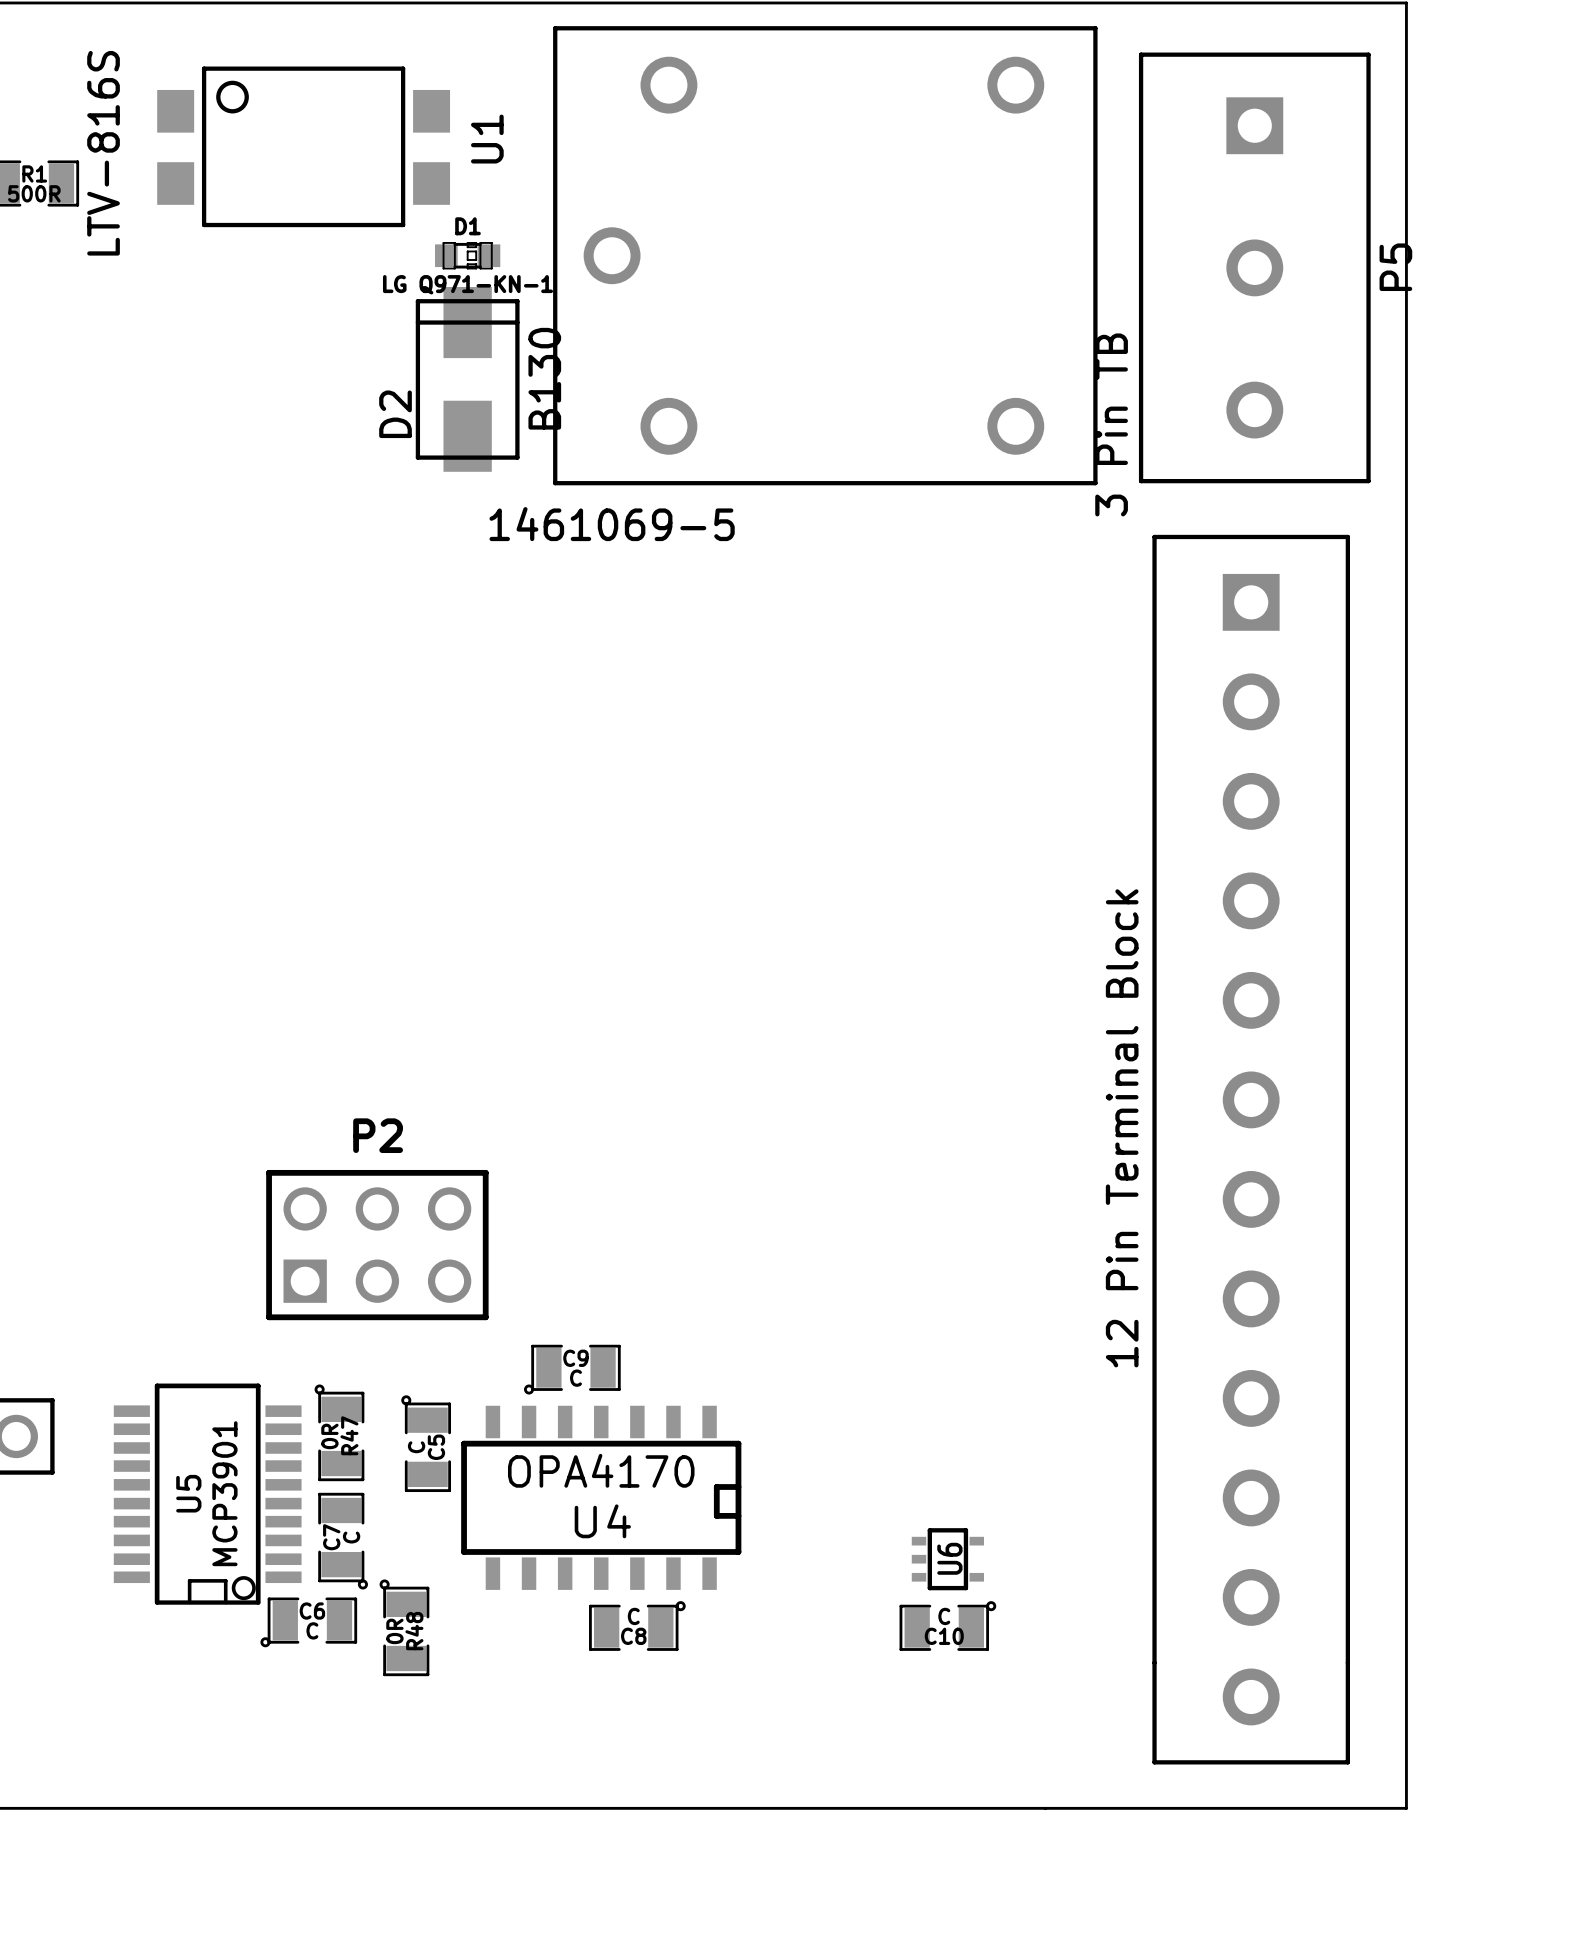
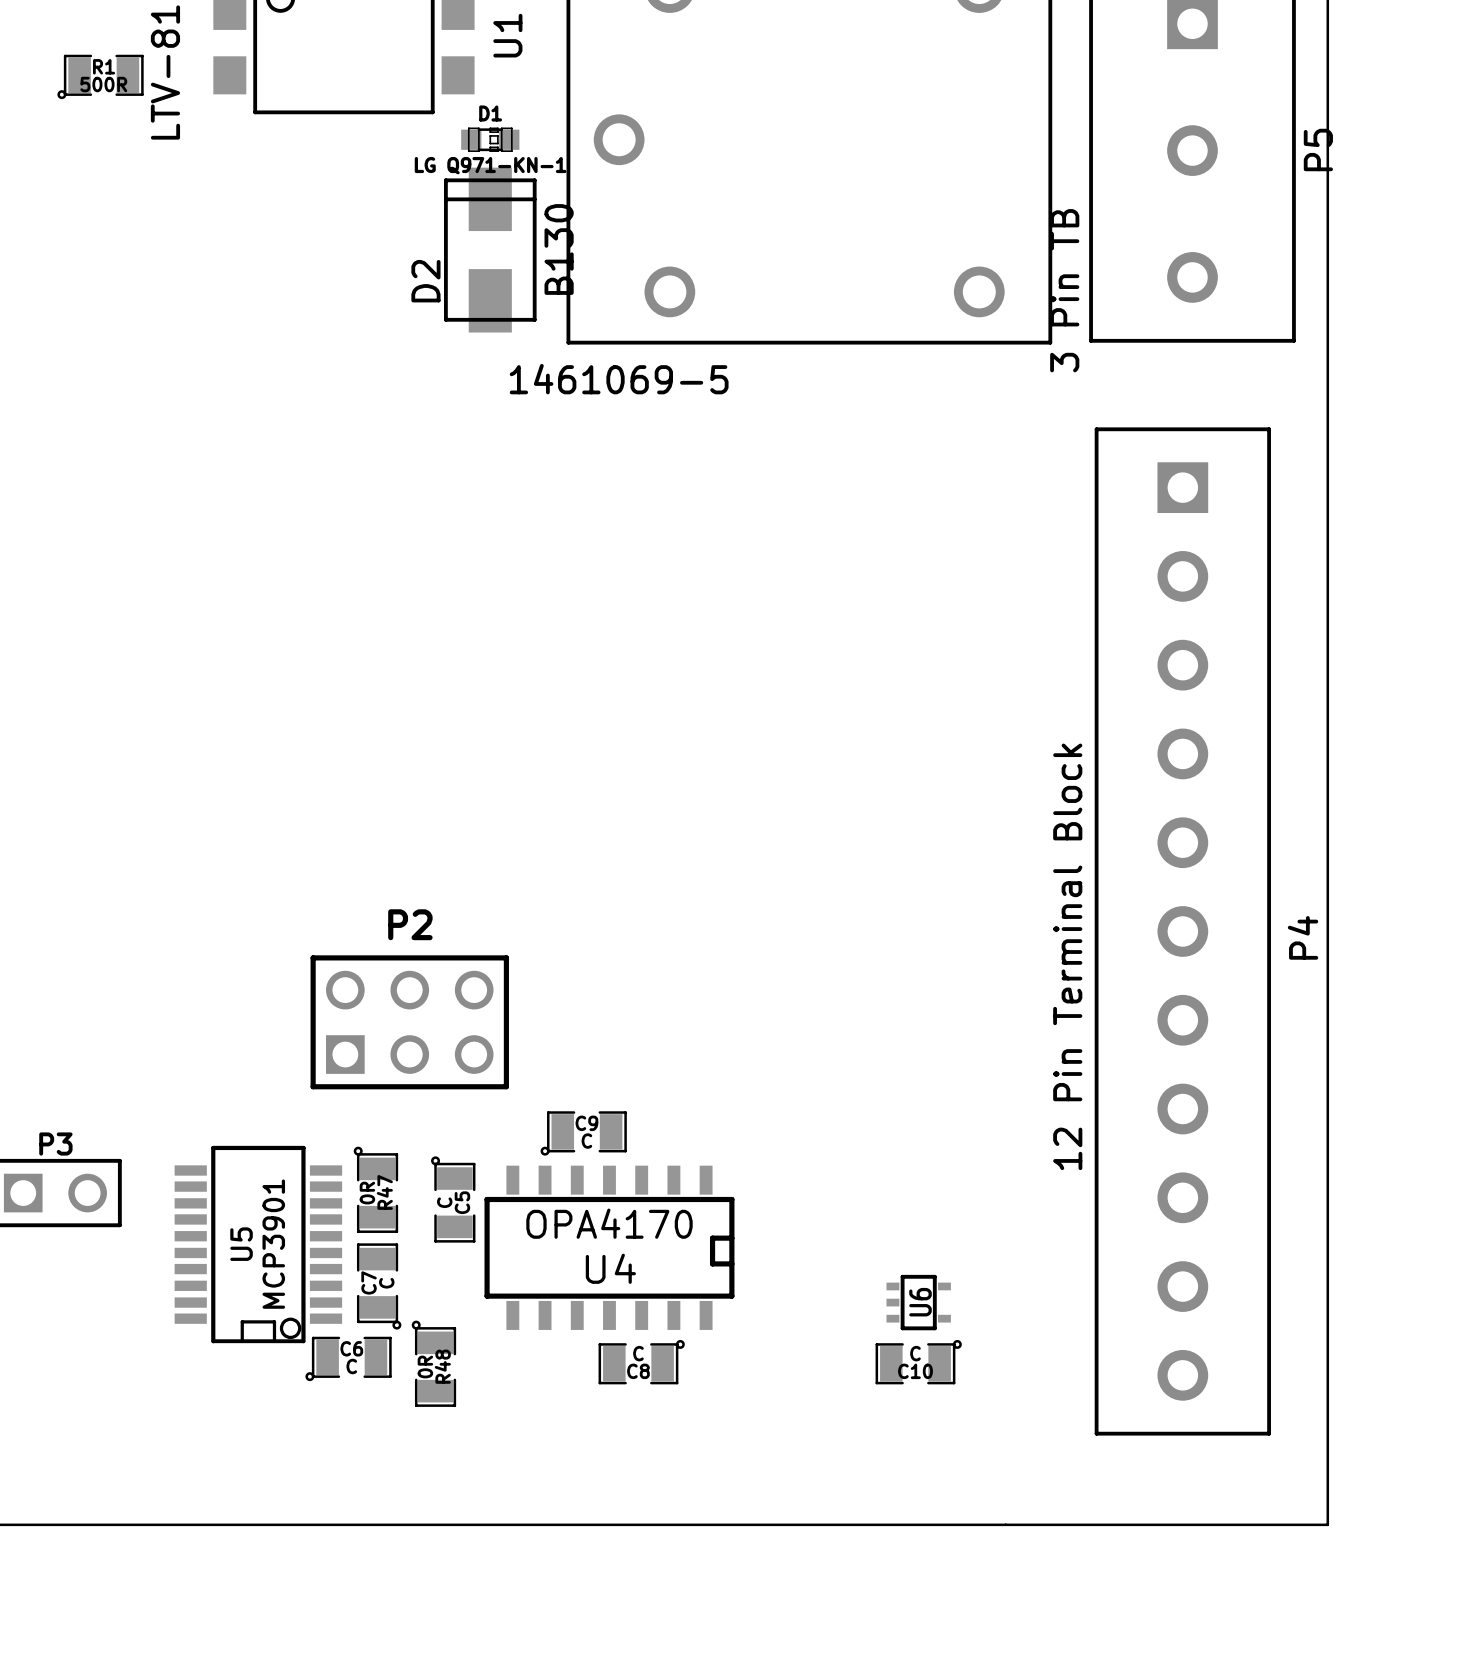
P4: none -> 12 Pin Terminal Block (1182, 931)
part: 12 Pin Terminal Block (1251, 1149) -> none

